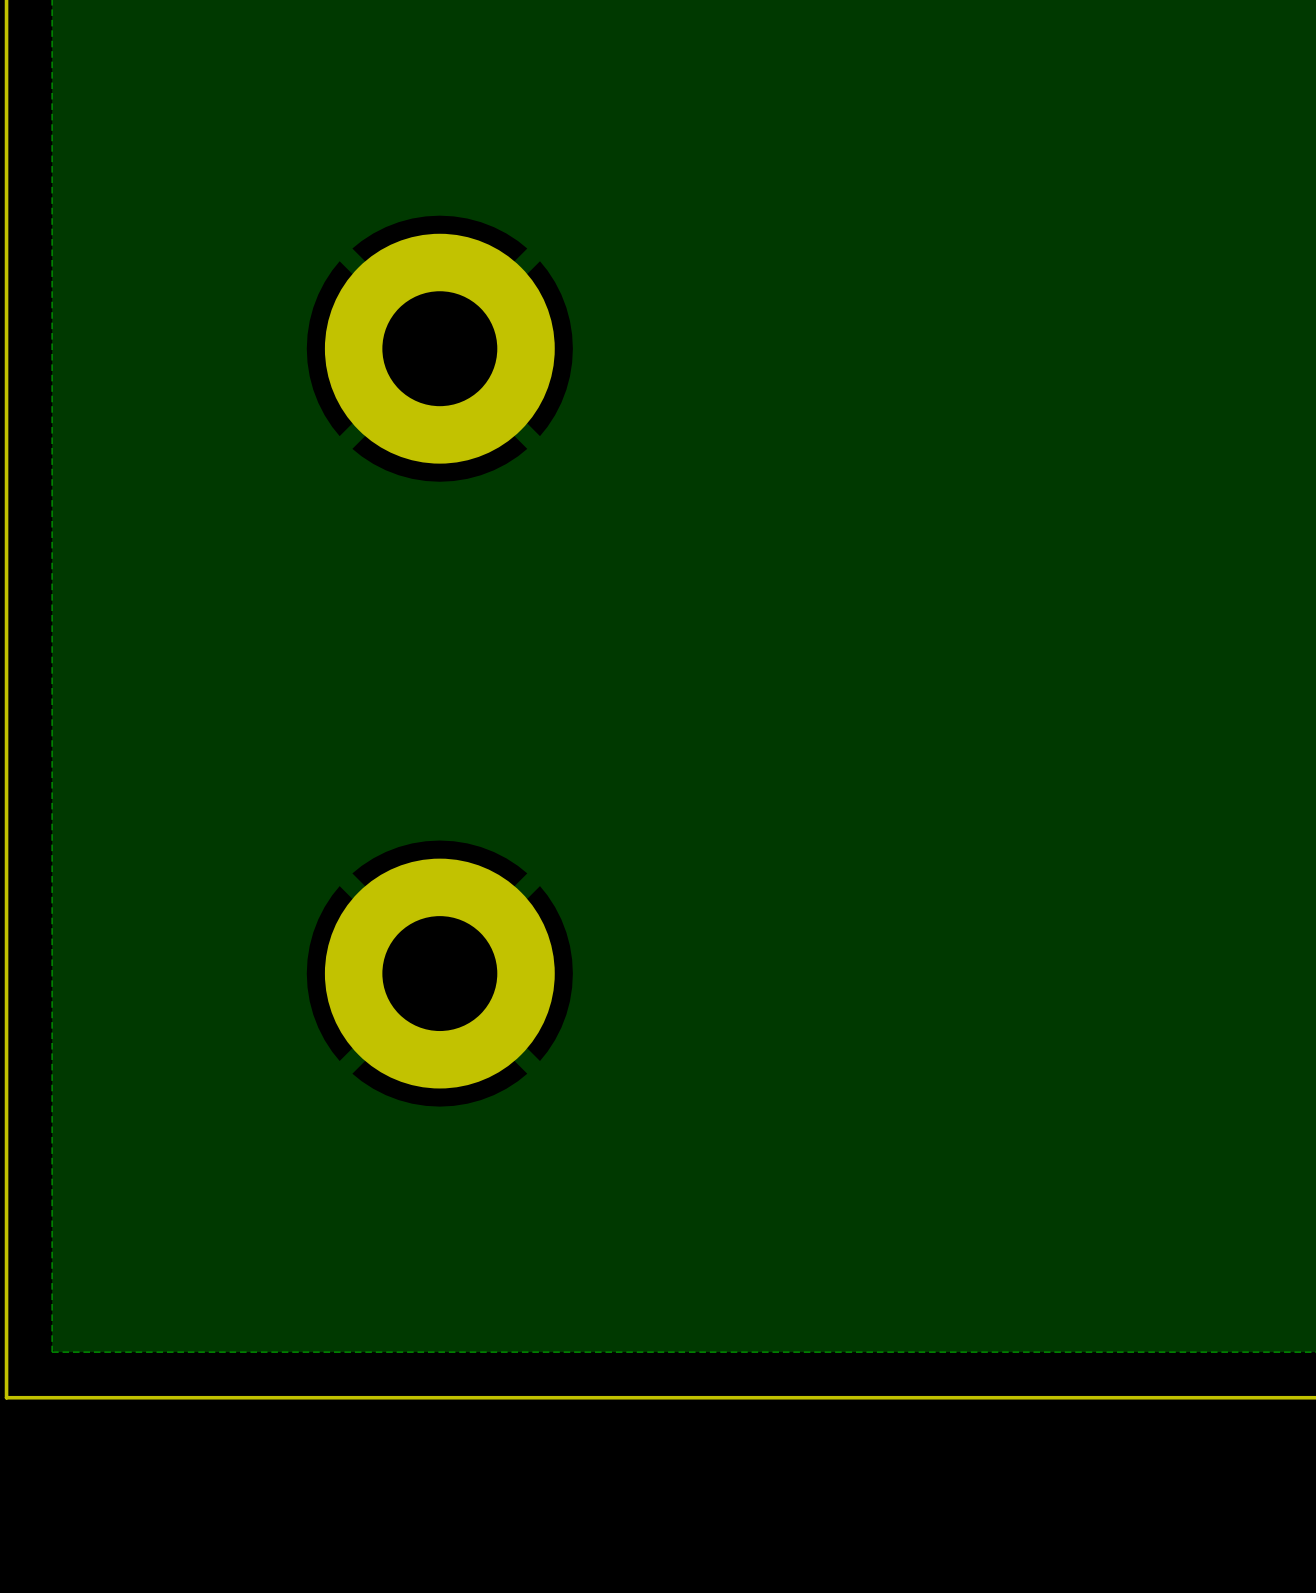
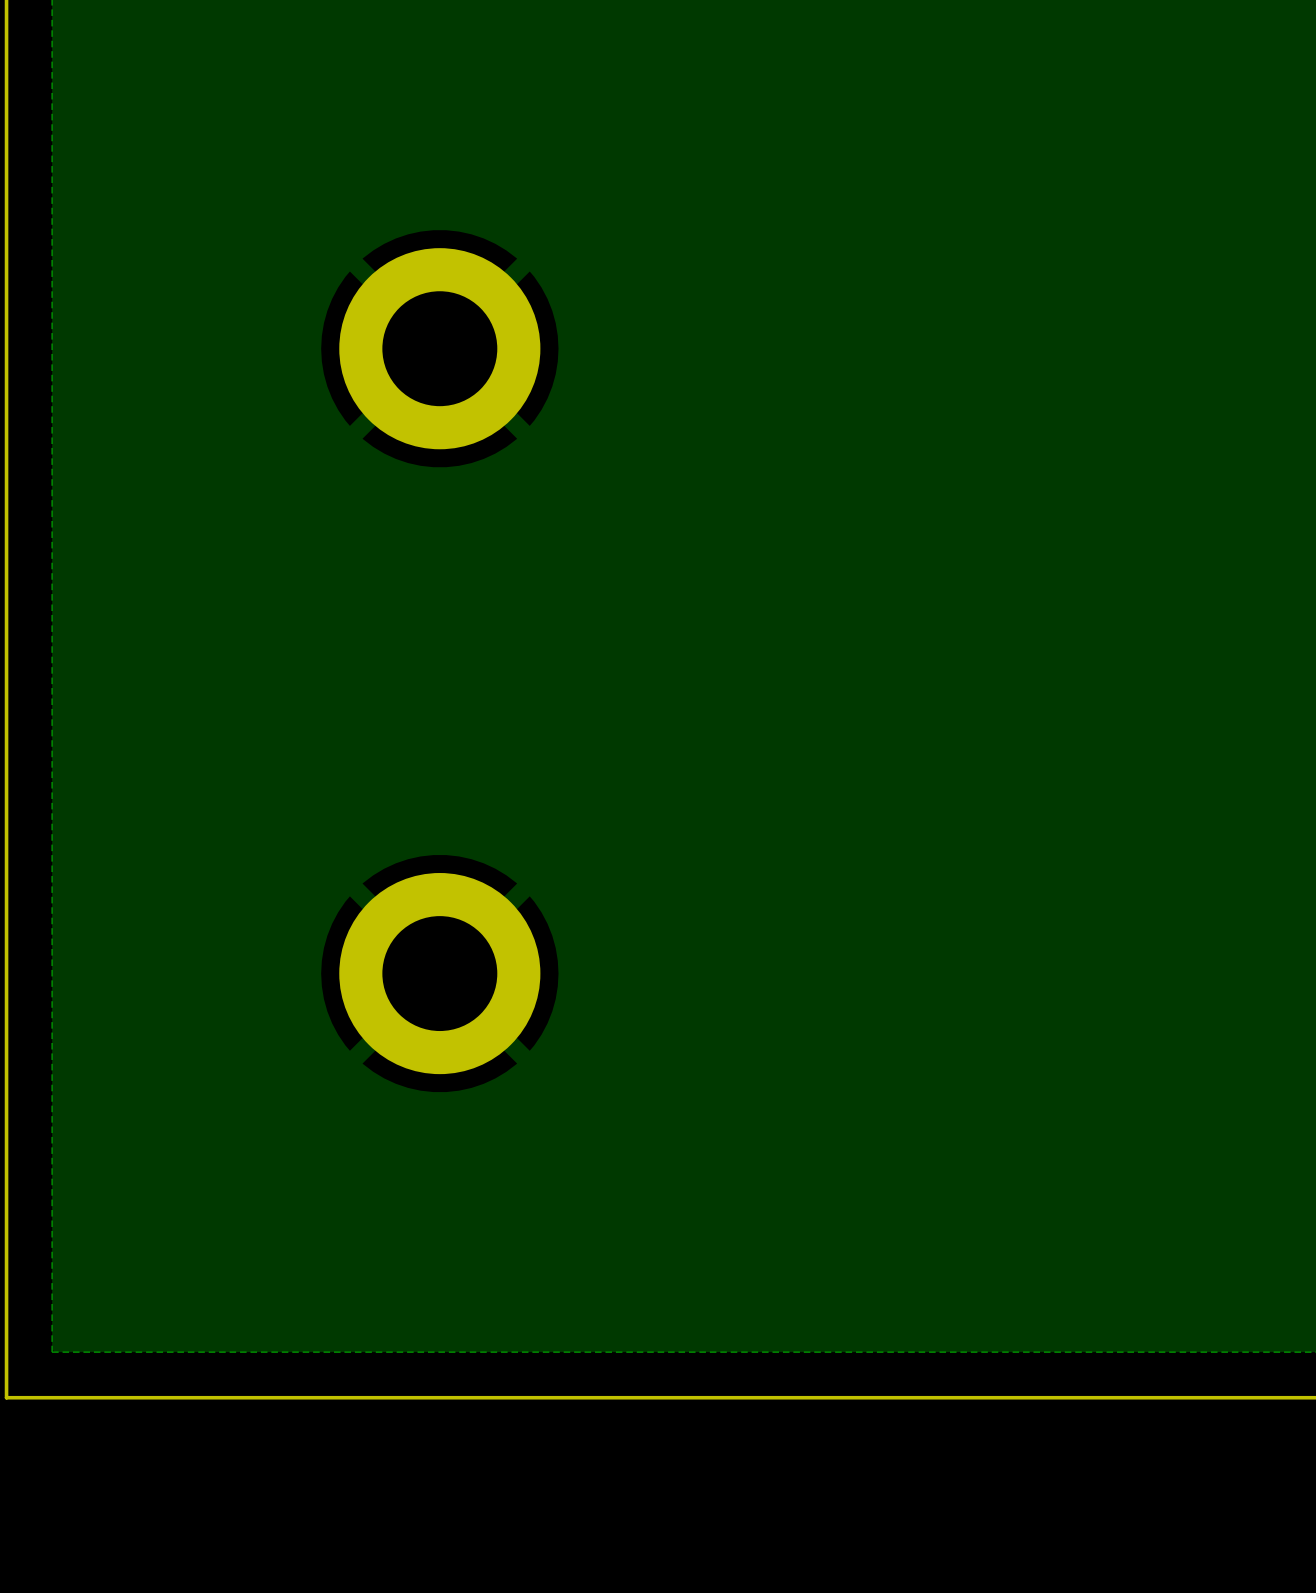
part footprint: [324, 233, 555, 464] -> [339, 248, 541, 450]
part footprint: [324, 858, 555, 1089] -> [339, 873, 541, 1075]

